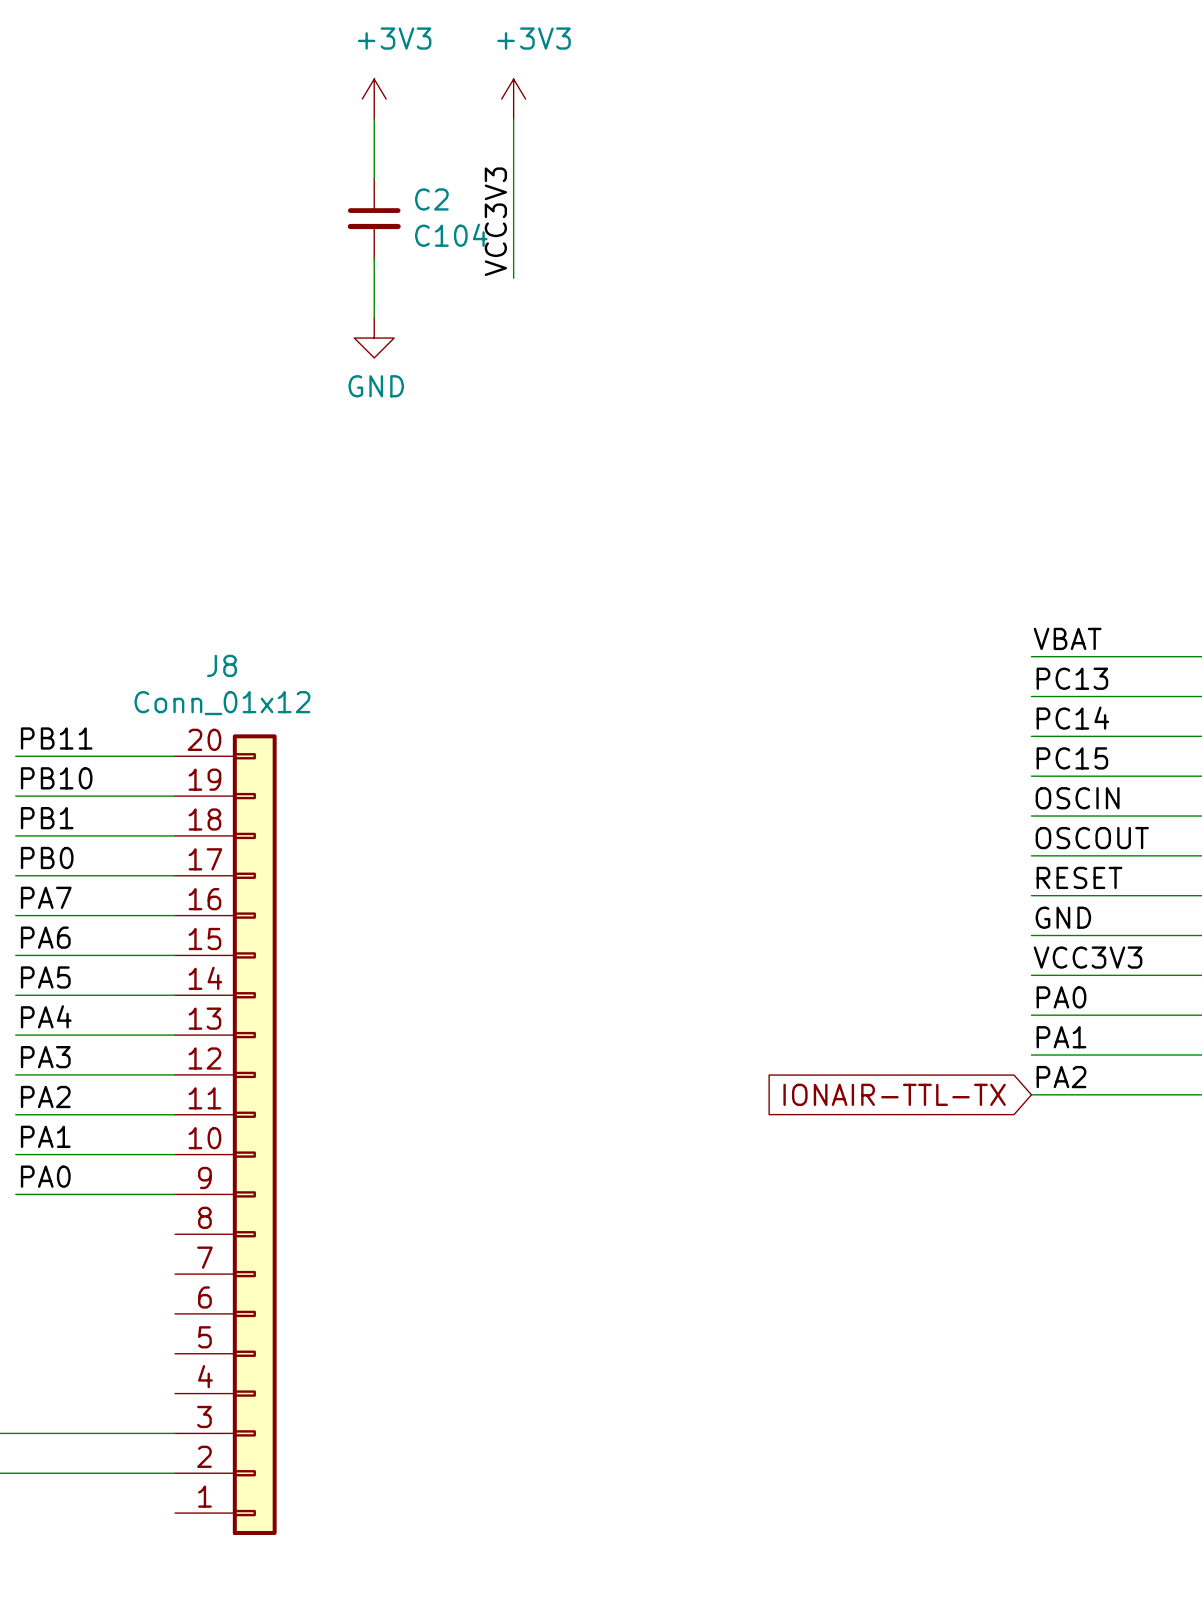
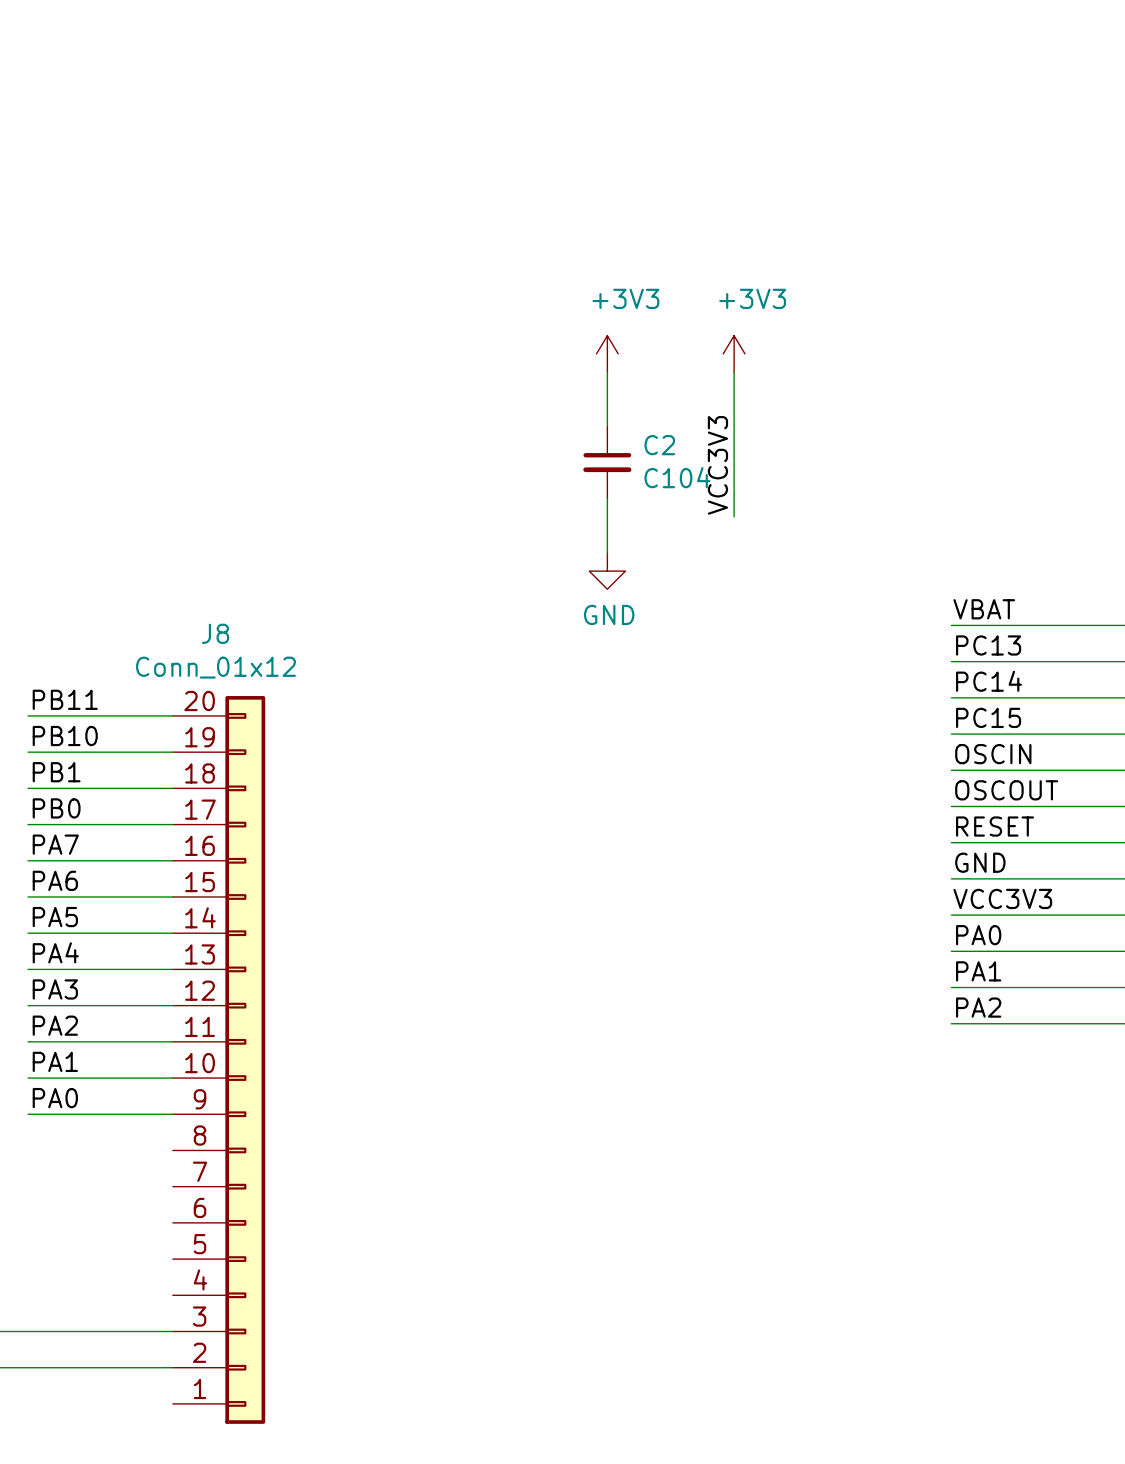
power symbol: +3V3 (374, 99) -> none
power symbol: +3V3 (513, 99) -> none
wire: (374, 118) (374, 178) -> (607, 371) (607, 426)
wire: (513, 118) (513, 278) -> (734, 371) (734, 516)
C2 position: (374, 218) -> (607, 462)
label position: VCC3V3 (495, 221) -> VCC3V3 (717, 465)
wire: (374, 258) (374, 318) -> (607, 498) (607, 553)
power symbol position: GND (374, 338) -> GND (607, 571)
power symbol: none -> +3V3 (607, 353)
power symbol: none -> +3V3 (734, 353)
global label: IONAIR-TTL-TX (894, 1094) -> none

